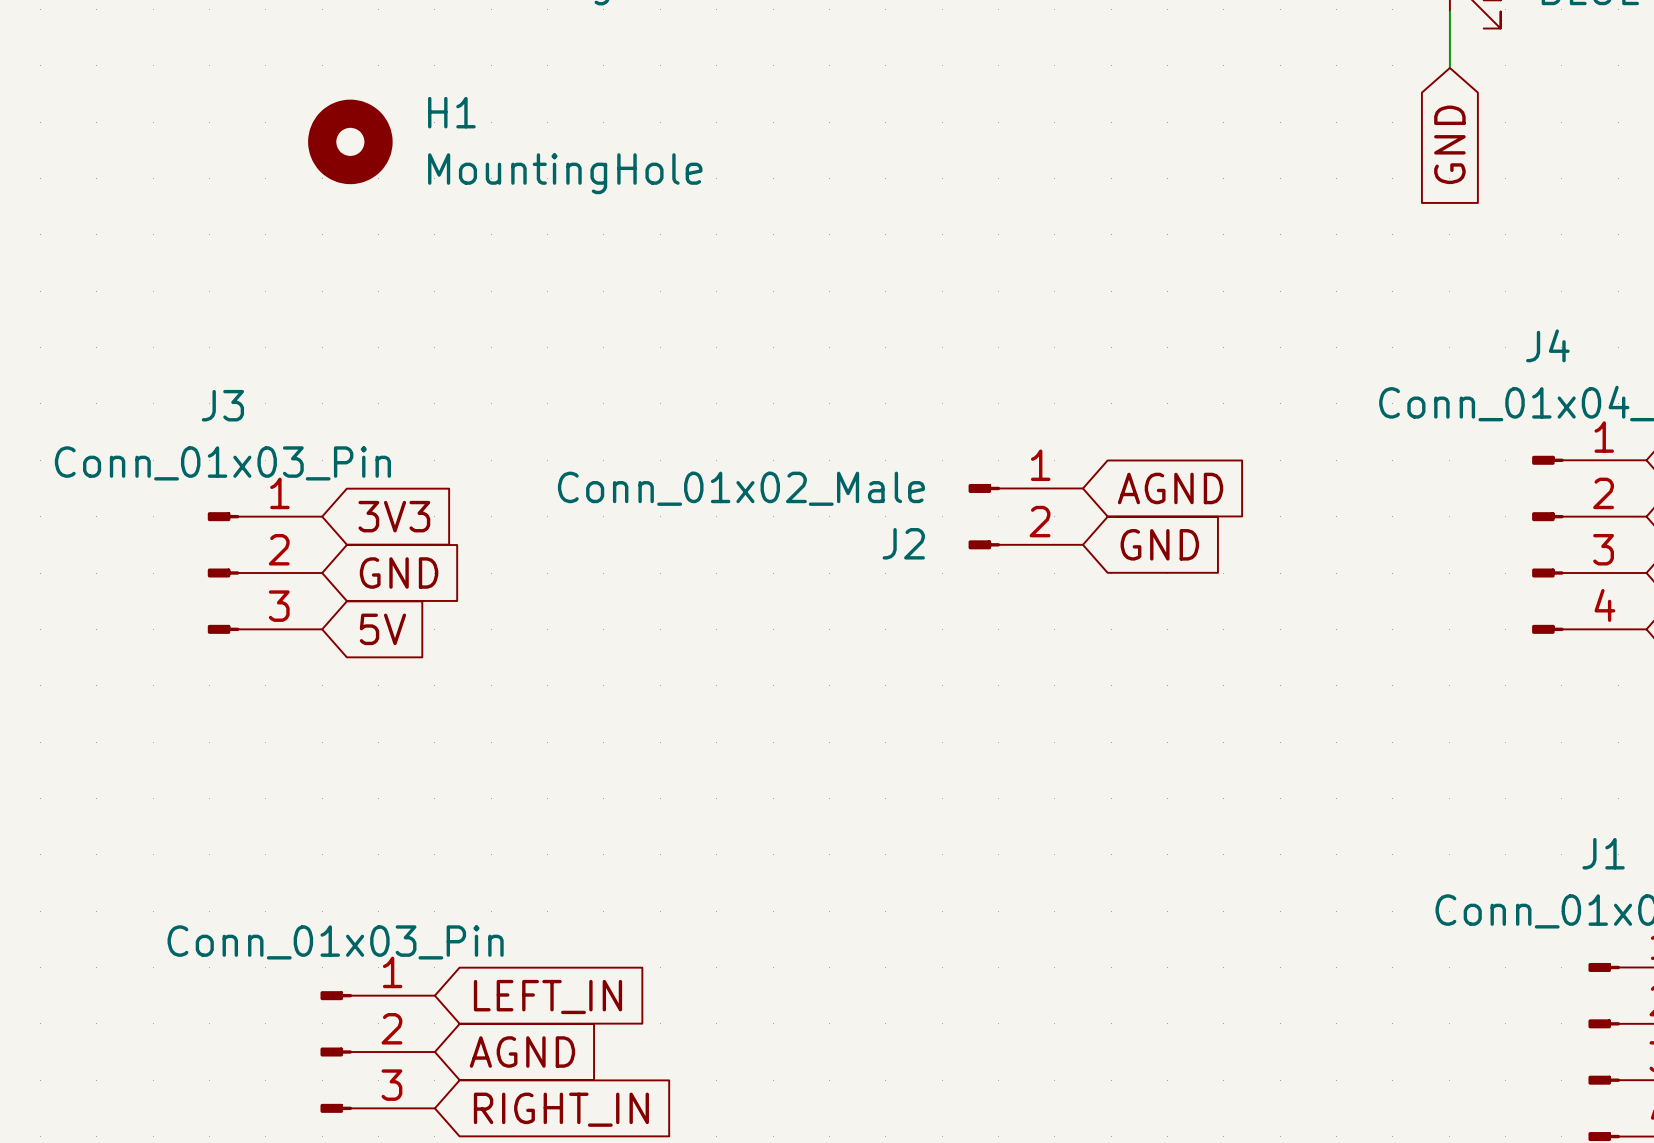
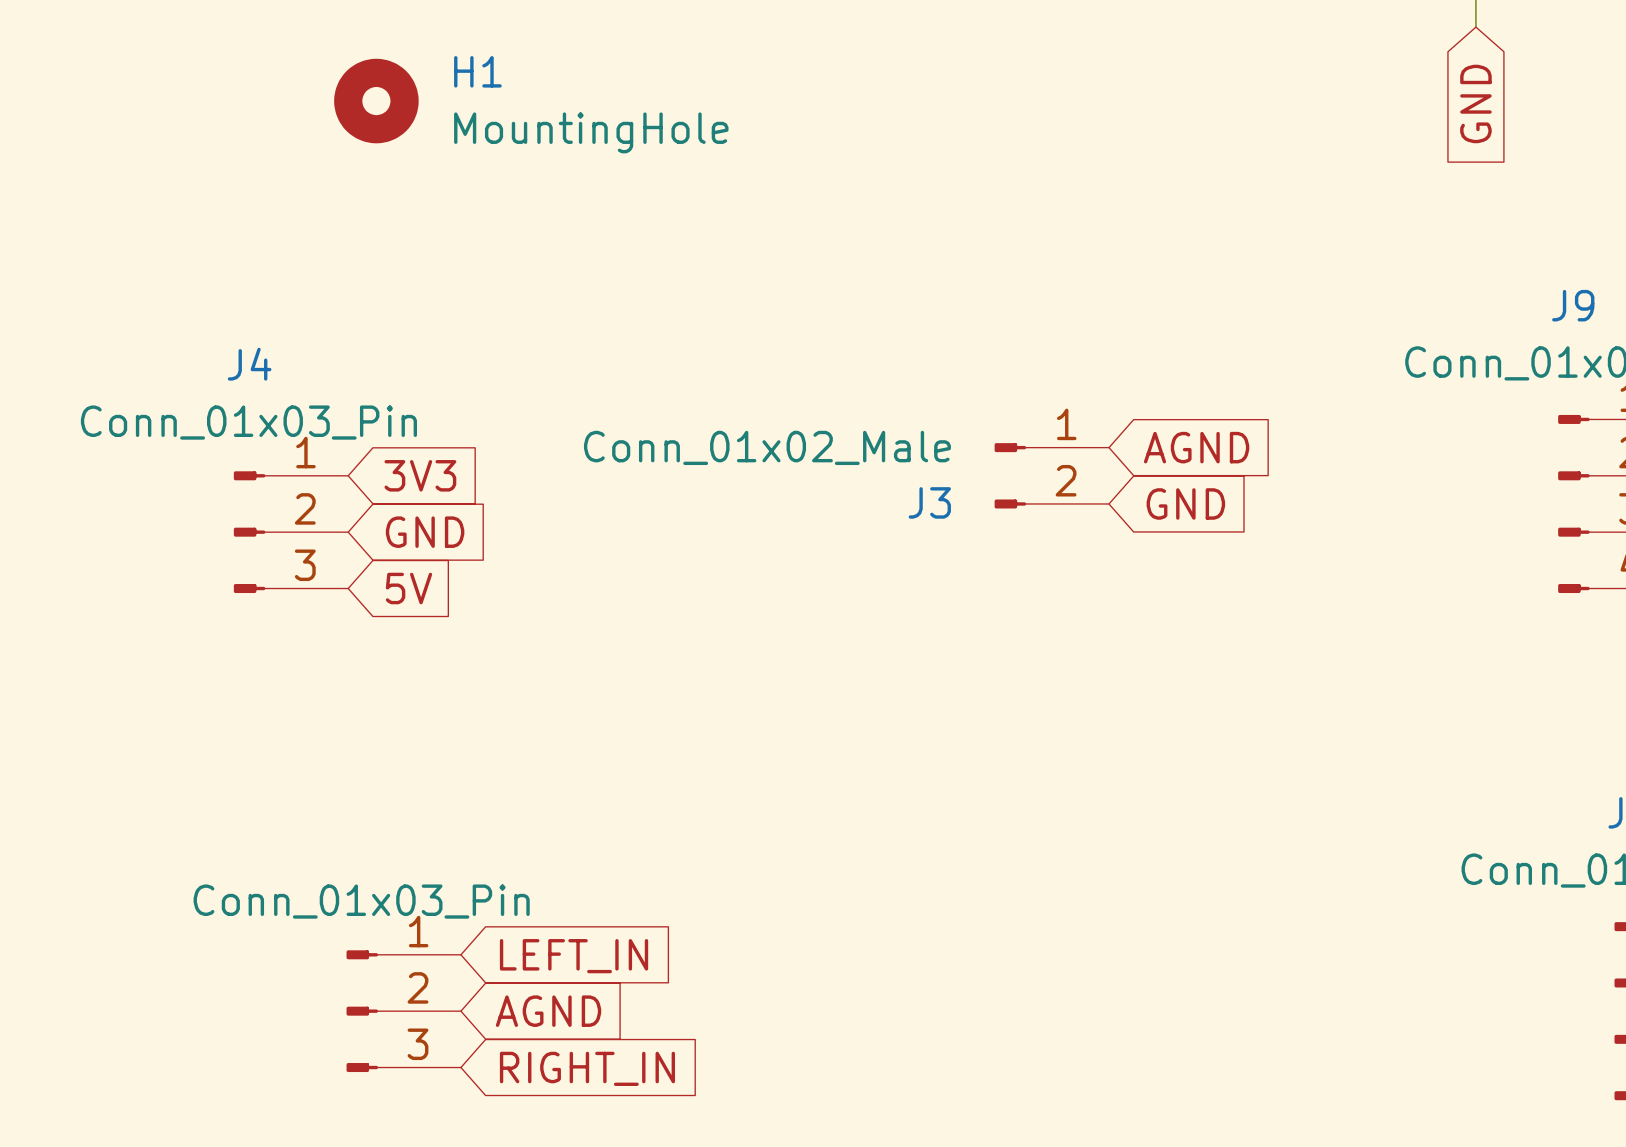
J4 name: J4 (1547, 345) -> J9 (1573, 305)
J3 name: J3 (222, 405) -> J4 (249, 364)
J2 name: J2 (903, 543) -> J3 (929, 502)

